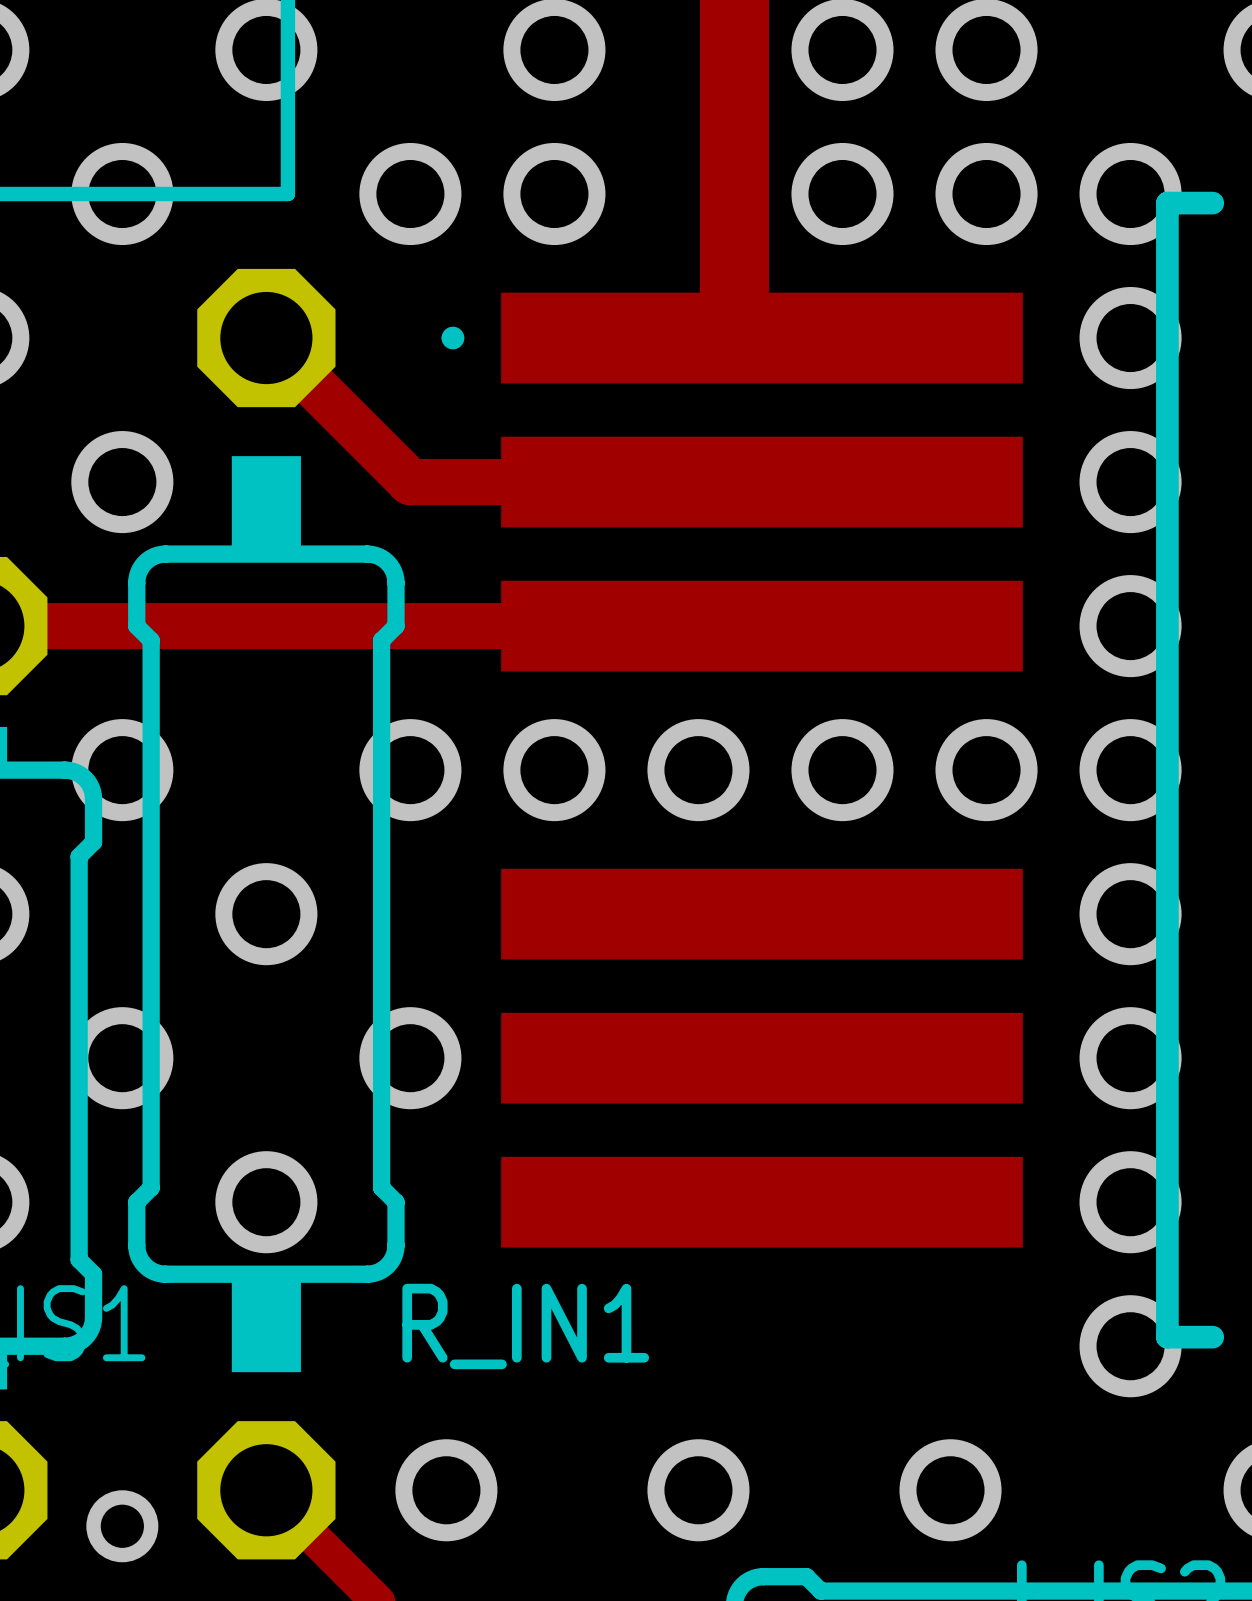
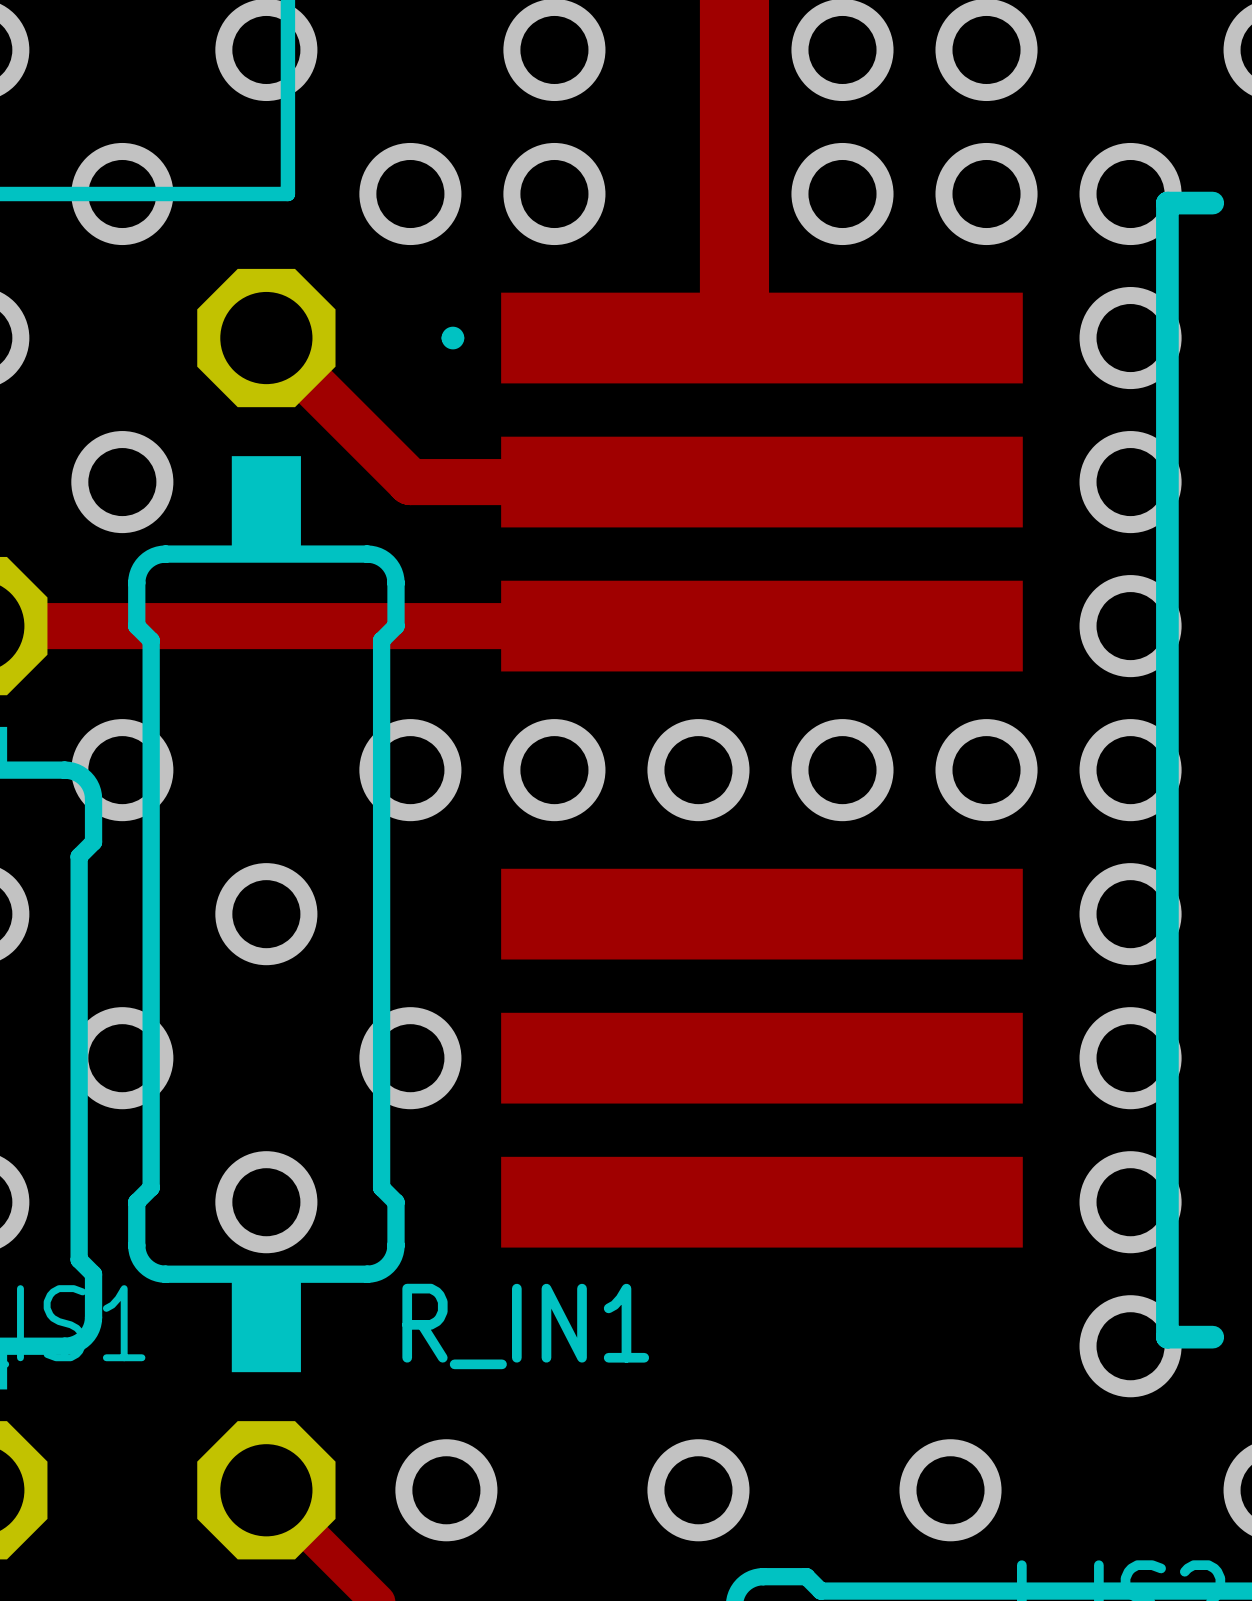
via: (122, 1526) -> none

